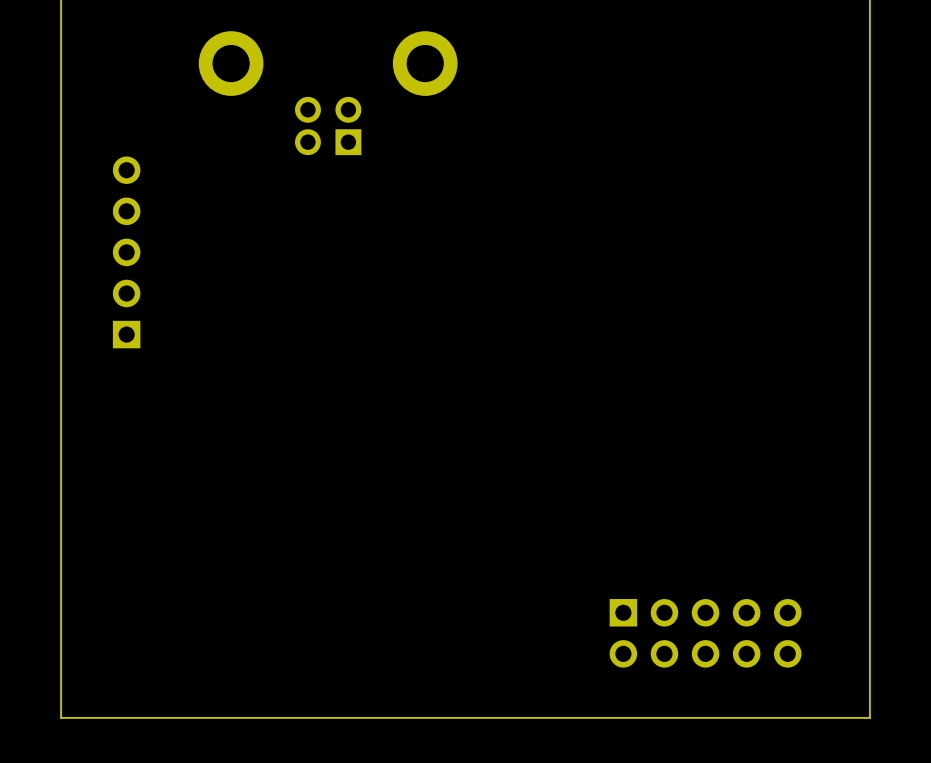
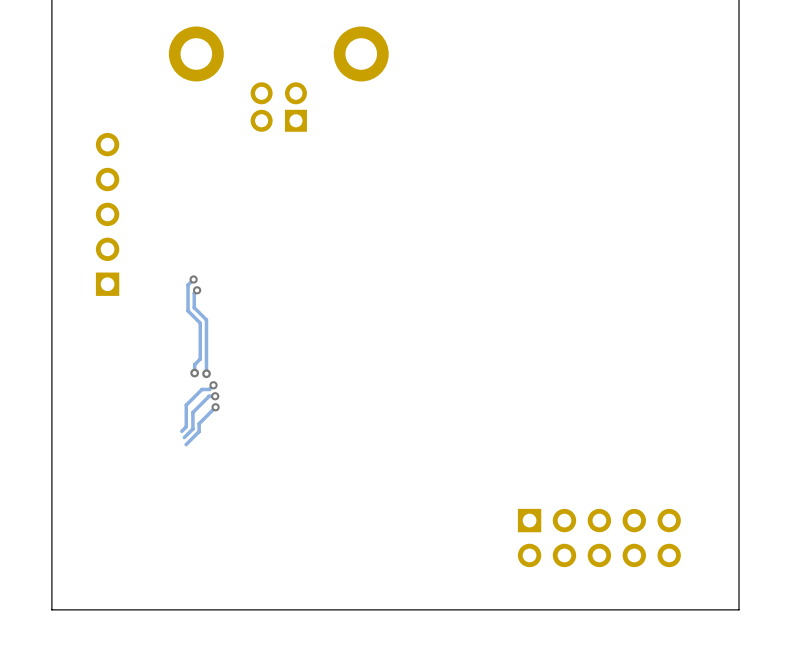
track: none -> (193, 279) (188, 285) (188, 310) (200, 323) (200, 359) (194, 364) (194, 373)
via: none -> (193, 279)
track: none -> (197, 290) (194, 293) (194, 307) (206, 319) (206, 373)
via: none -> (197, 290)
via: none -> (194, 373)
via: none -> (206, 373)
track: none -> (213, 385) (209, 389) (201, 389) (186, 405) (186, 426) (181, 431)
via: none -> (213, 385)
track: none -> (215, 396) (209, 396) (192, 412) (192, 428) (184, 437)
via: none -> (215, 396)
track: none -> (215, 407) (199, 423) (199, 431) (186, 444)
via: none -> (215, 407)

